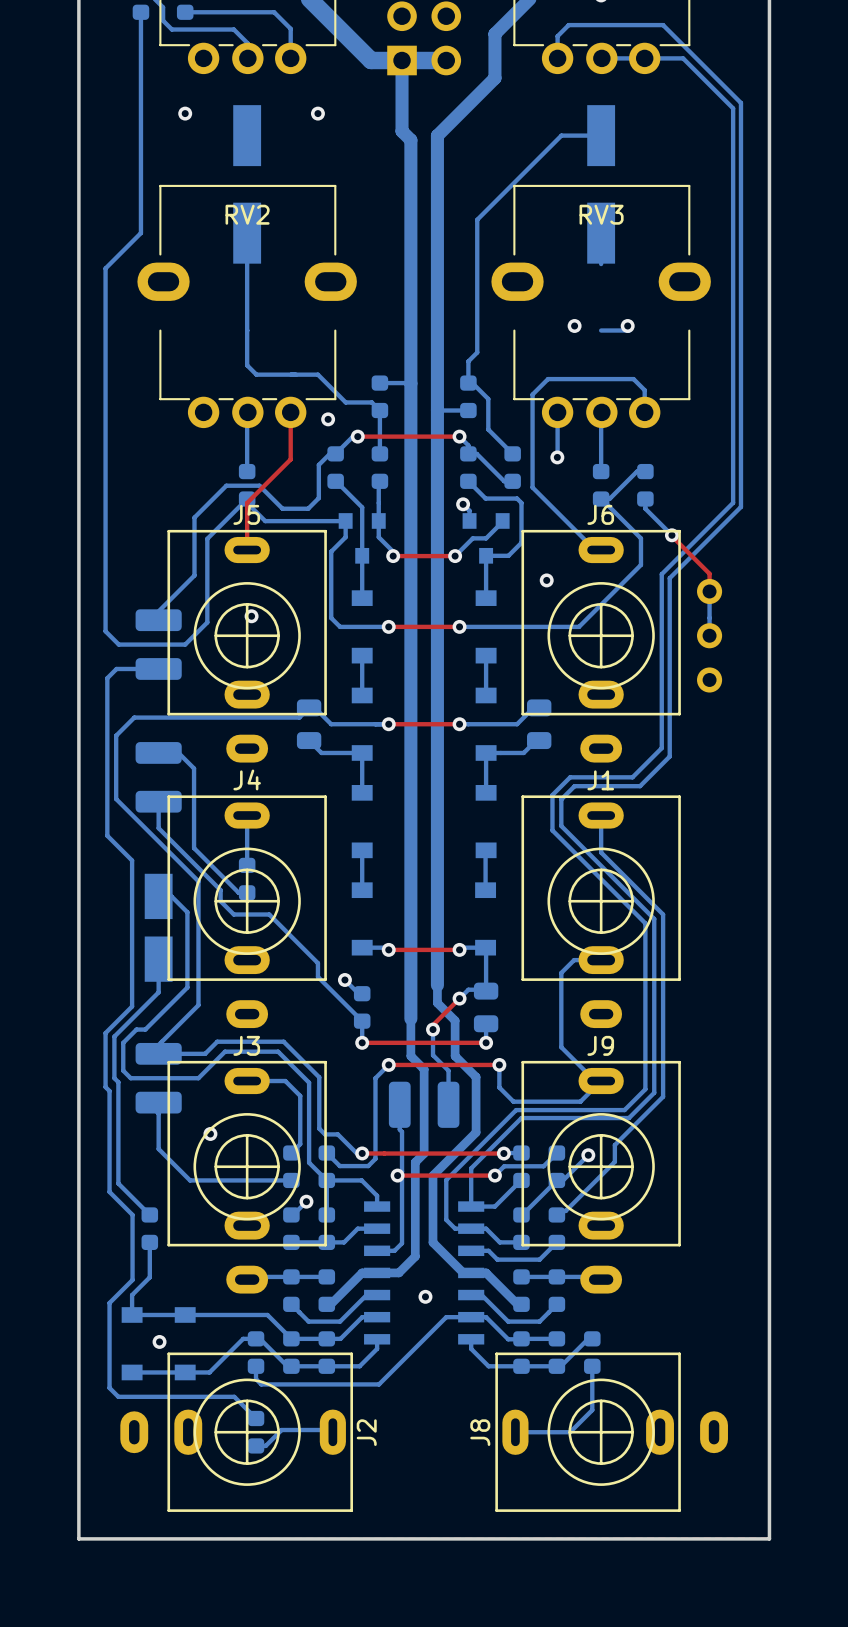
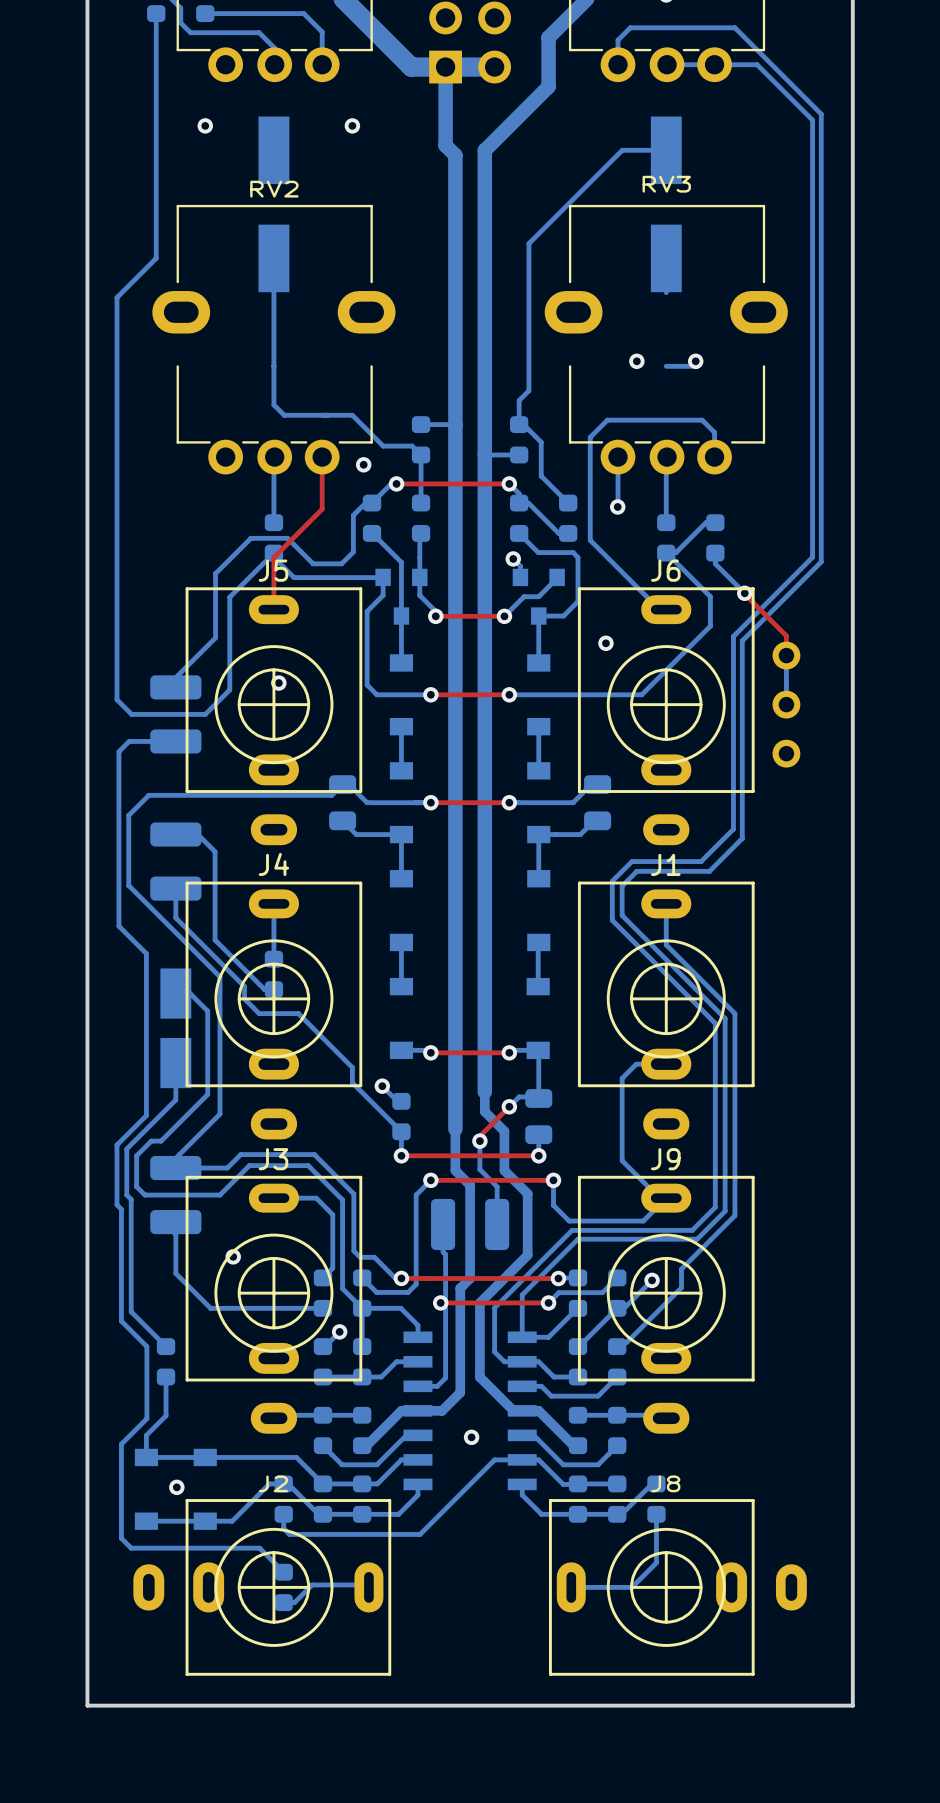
RV2 name position: RV2 (247, 214) -> RV2 (274, 189)
RV3 name position: RV3 (601, 214) -> RV3 (666, 184)
J2 name rotation: 0° (366, 1432) -> 90° clockwise (273, 1483)
J2 name position: J2 (366, 1432) -> J2 (273, 1483)
J8 name rotation: 0° (480, 1432) -> 90° clockwise (665, 1483)
J8 name position: J8 (480, 1432) -> J8 (665, 1483)

